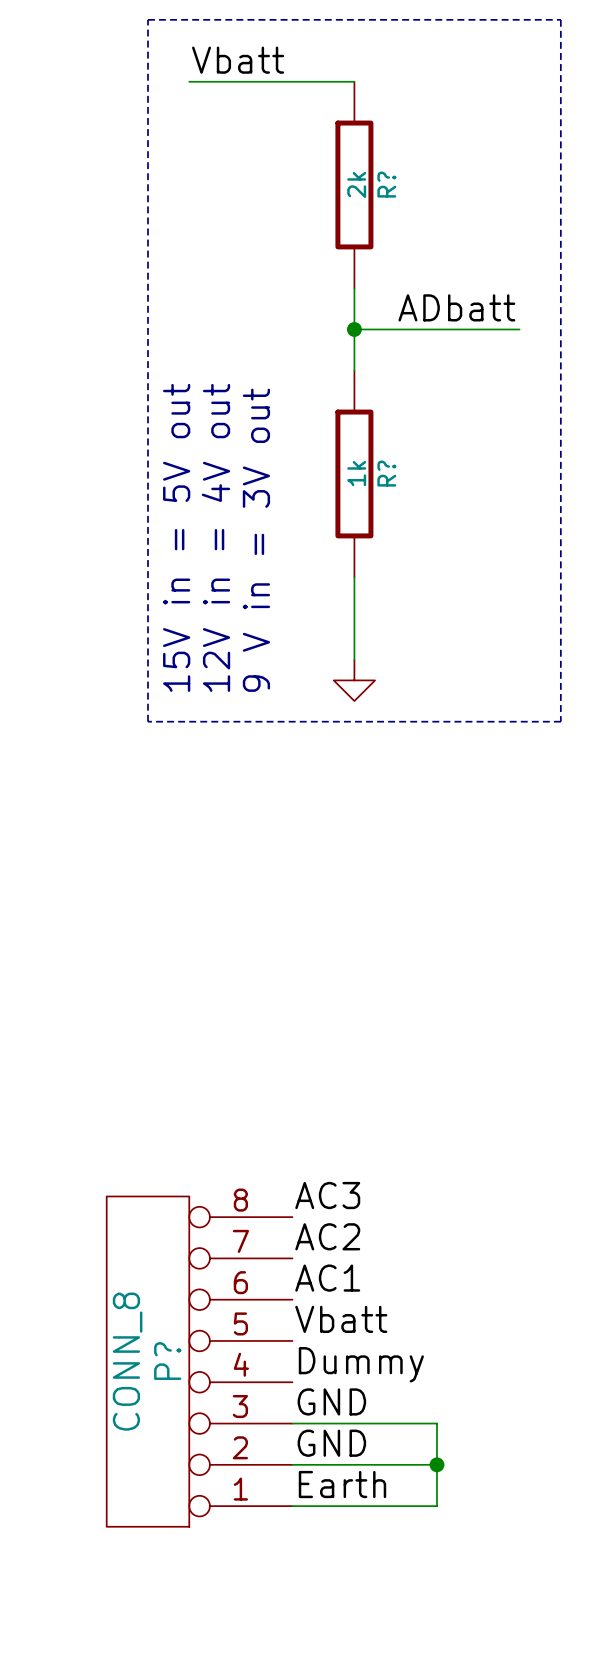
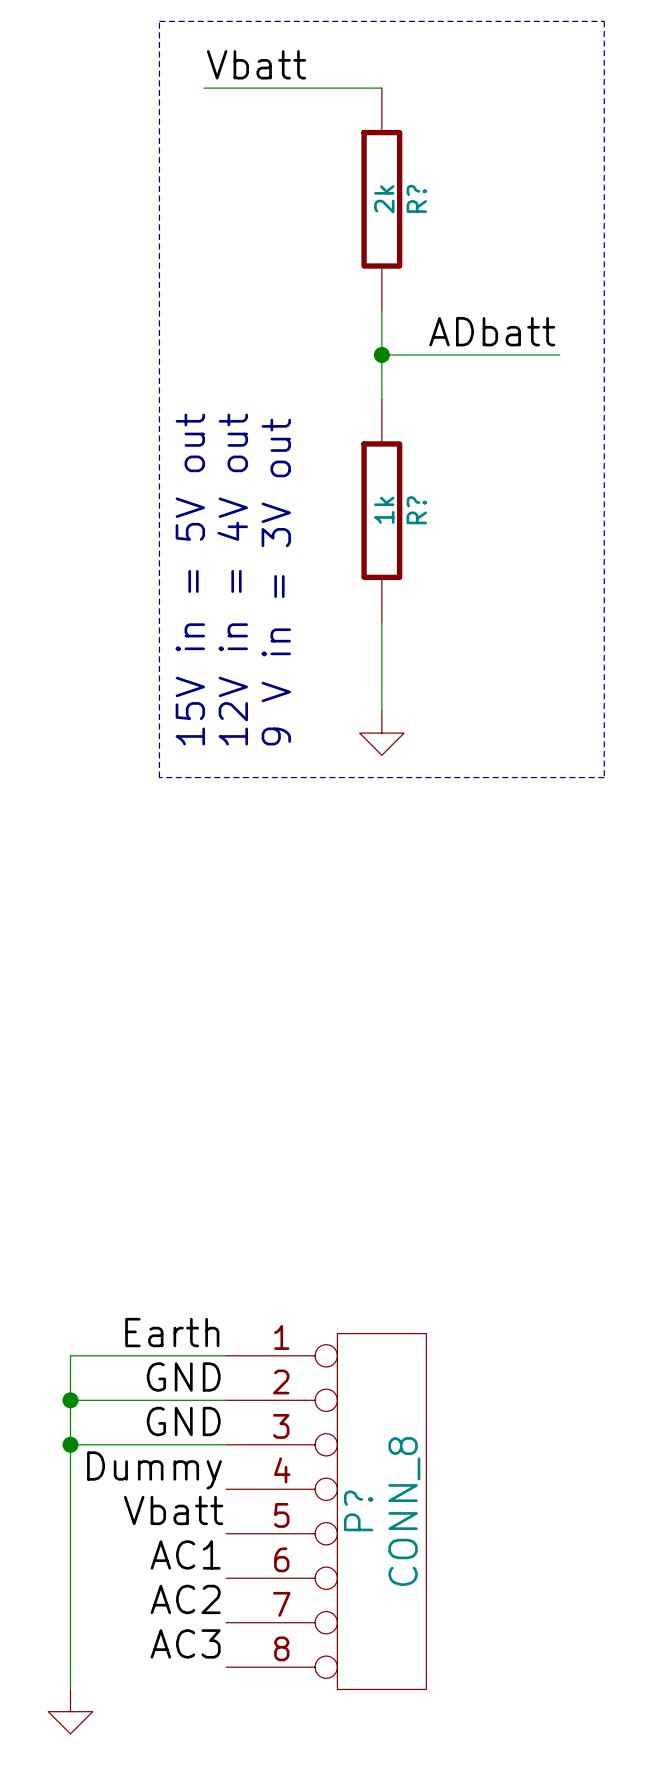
label position: AC3 (327, 1195) -> AC3 (185, 1643)
label position: AC2 (327, 1236) -> AC2 (185, 1599)
wire: none -> (226, 1355) (70, 1355) (70, 1689)
label: none -> GND (183, 1377)
label position: AC1 (327, 1278) -> AC1 (185, 1554)
wire: none -> (70, 1400) (226, 1400)
junction: none -> (70, 1400)
label: none -> GND (183, 1421)
label position: Vbatt (341, 1319) -> Vbatt (173, 1510)
junction: none -> (70, 1444)
P? rotation: 0° (147, 1361) -> 180° (381, 1511)
label position: Dummy (361, 1364) -> Dummy (154, 1470)
label: GND (331, 1401) -> none
wire: (292, 1423) (436, 1423) (436, 1506) (292, 1506) -> none
label: GND (331, 1443) -> none
wire: (292, 1464) (436, 1464) -> (70, 1444) (226, 1444)
junction: (436, 1464) -> none
label position: Earth (342, 1484) -> Earth (172, 1332)
power symbol: none -> (70, 1711)

